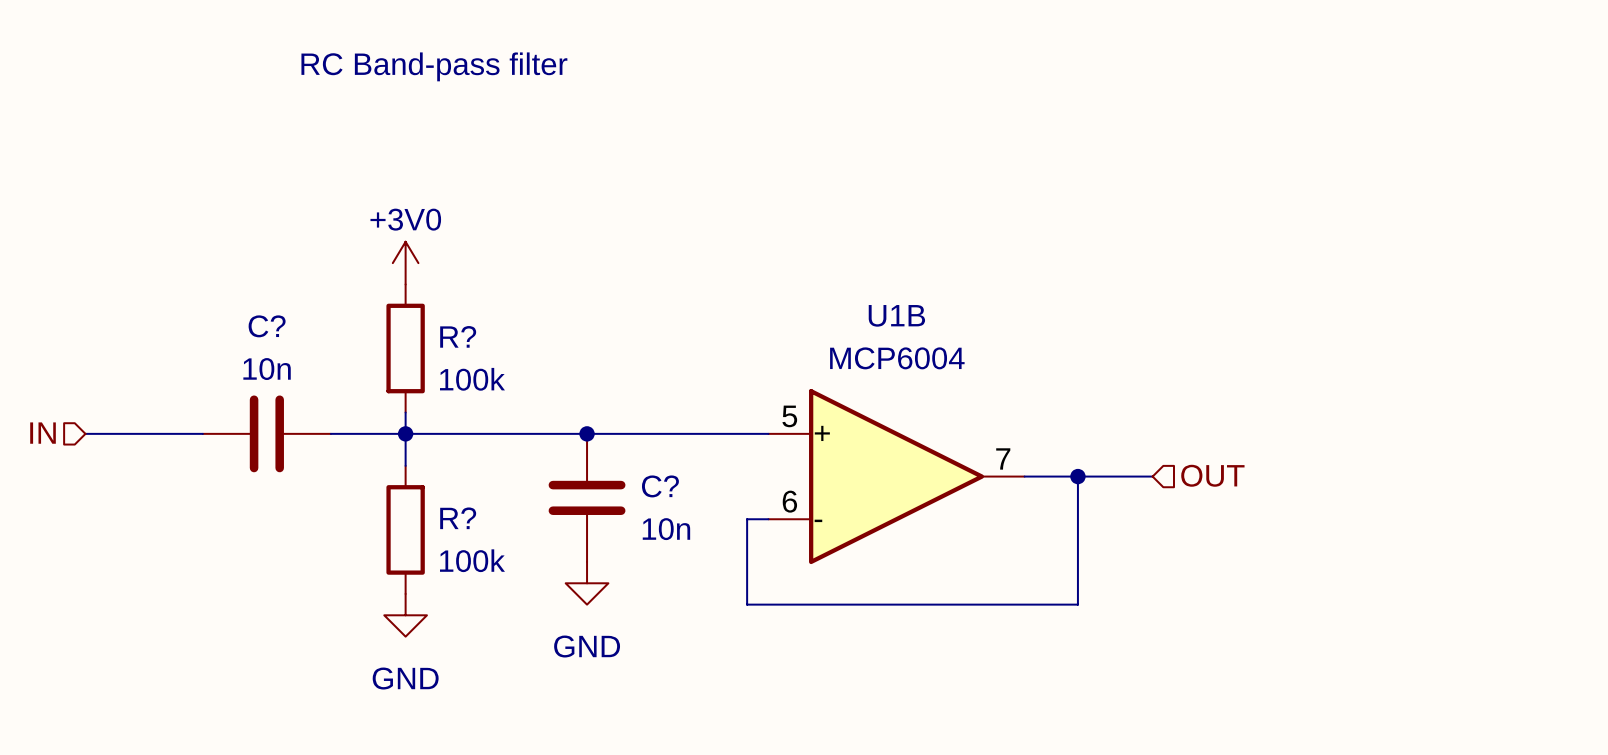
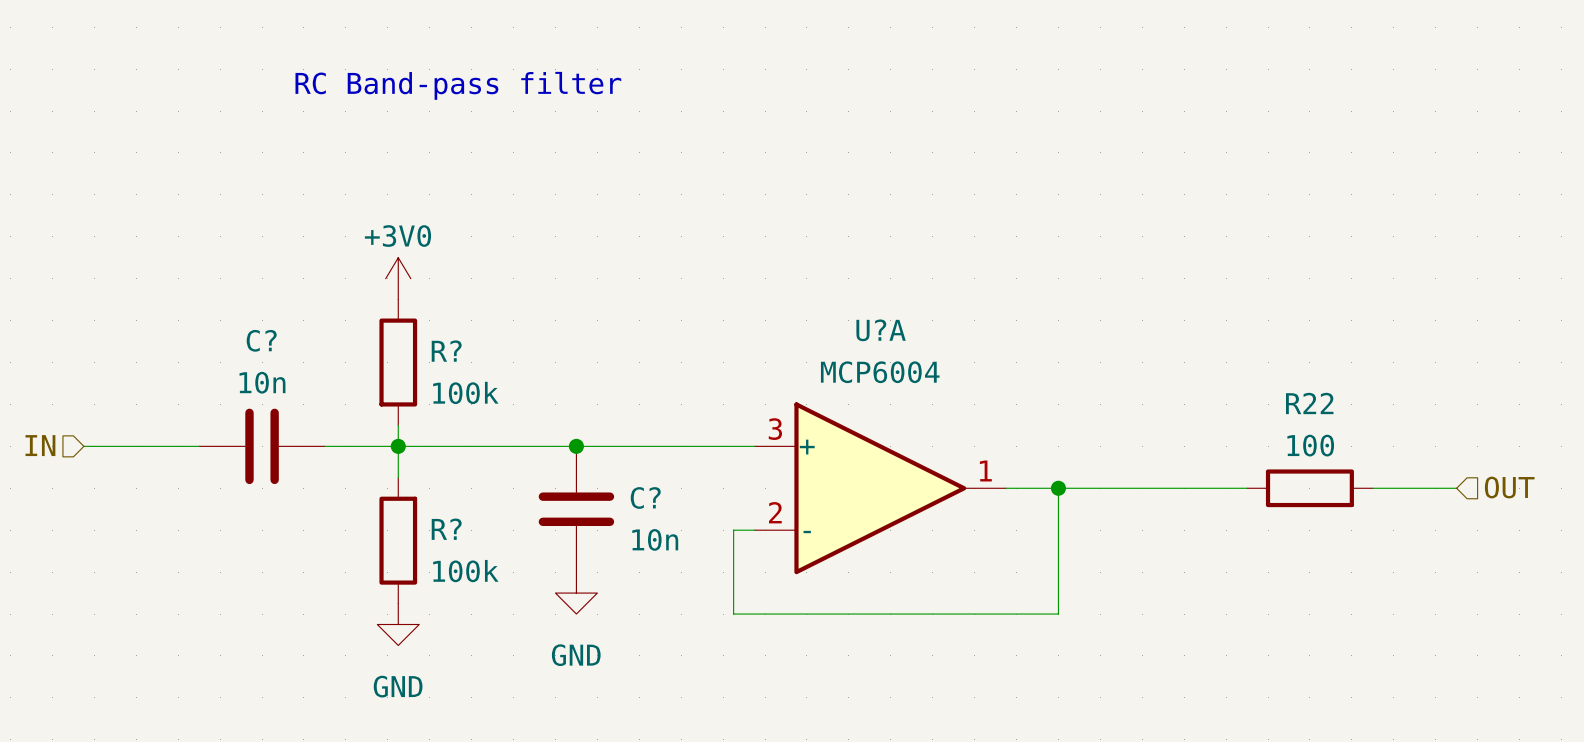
U1B name: U1B (896, 315) -> U?A (881, 330)
U1B pin number: 5 (789, 416) -> 3 (775, 429)
U1B pin number: 7 (1003, 458) -> 1 (985, 470)
hierarchical label position: OUT (1212, 475) -> OUT (1509, 487)
wire: none -> (1131, 488) (1247, 488)
R22: none -> 100 (1309, 488)
wire: none -> (1372, 488) (1456, 488)
U1B pin number: 6 (789, 501) -> 2 (775, 512)

